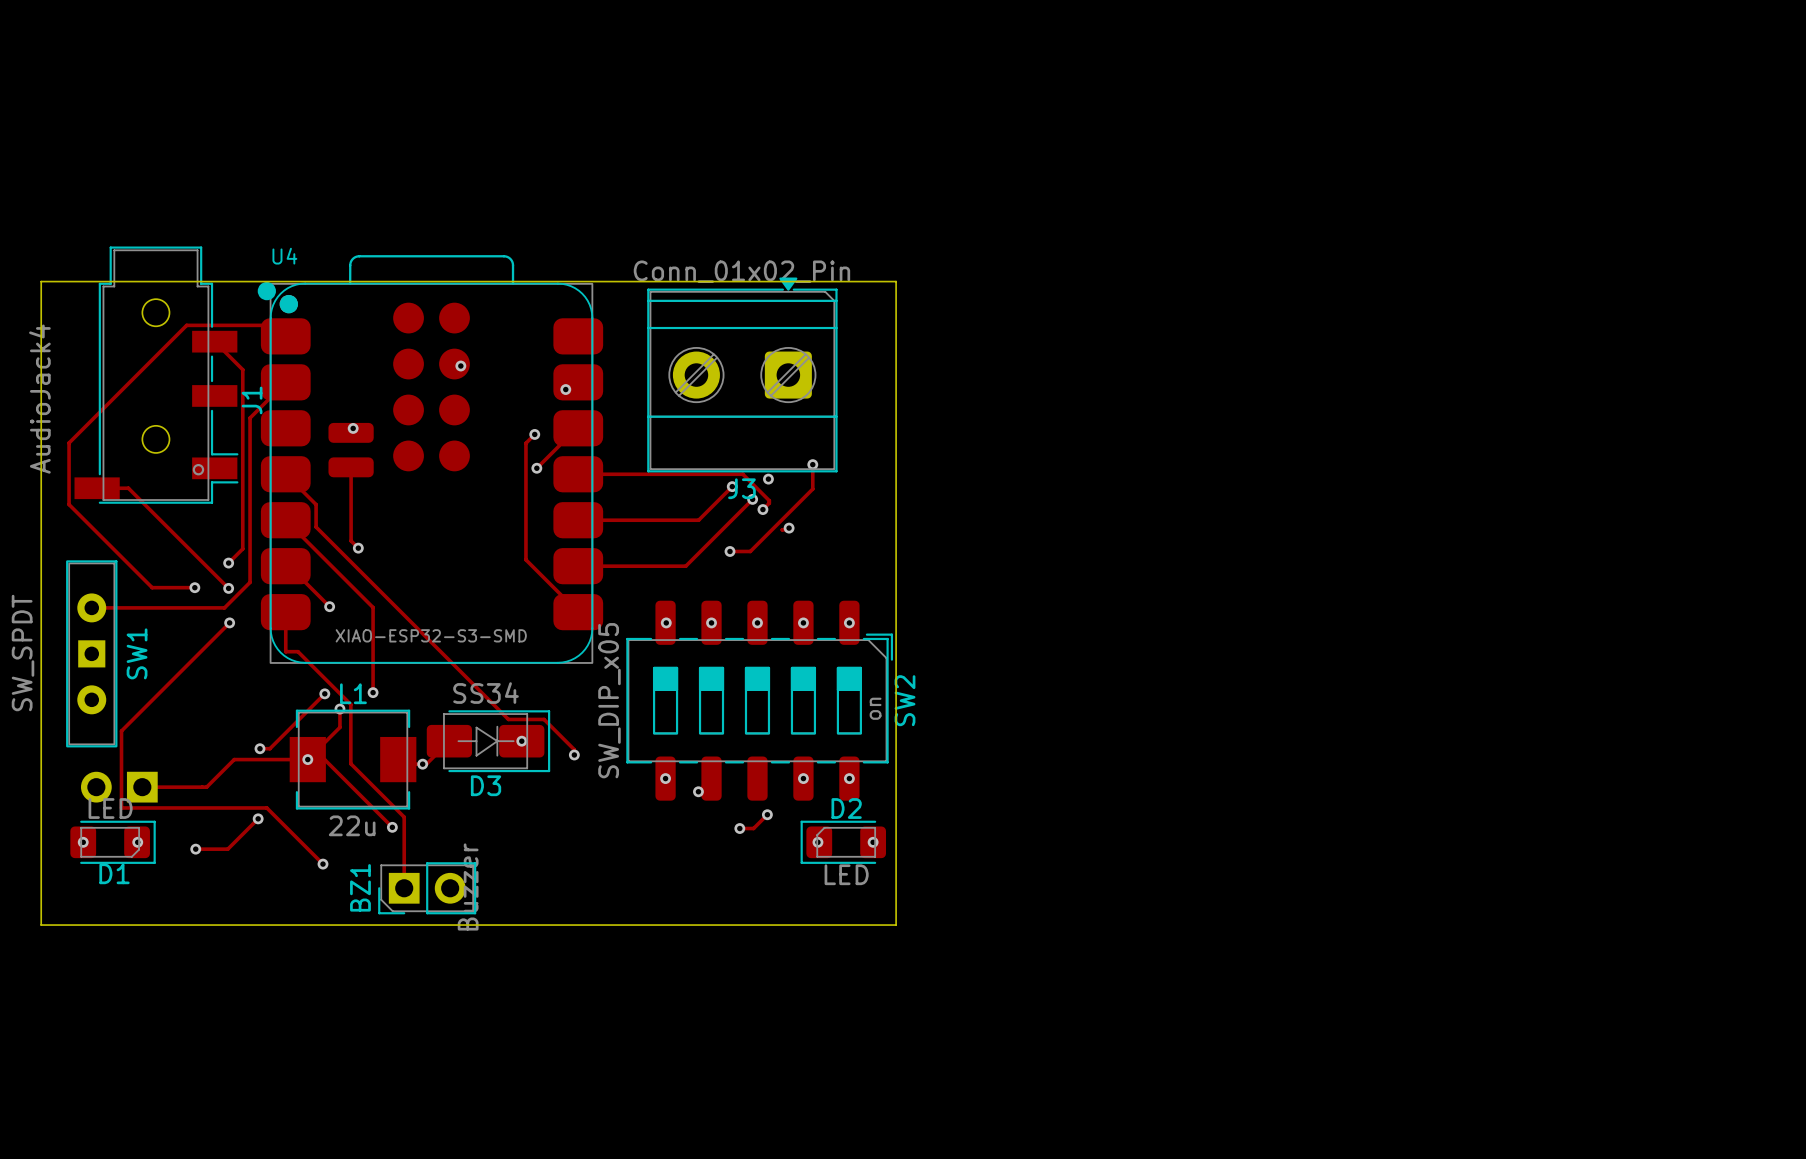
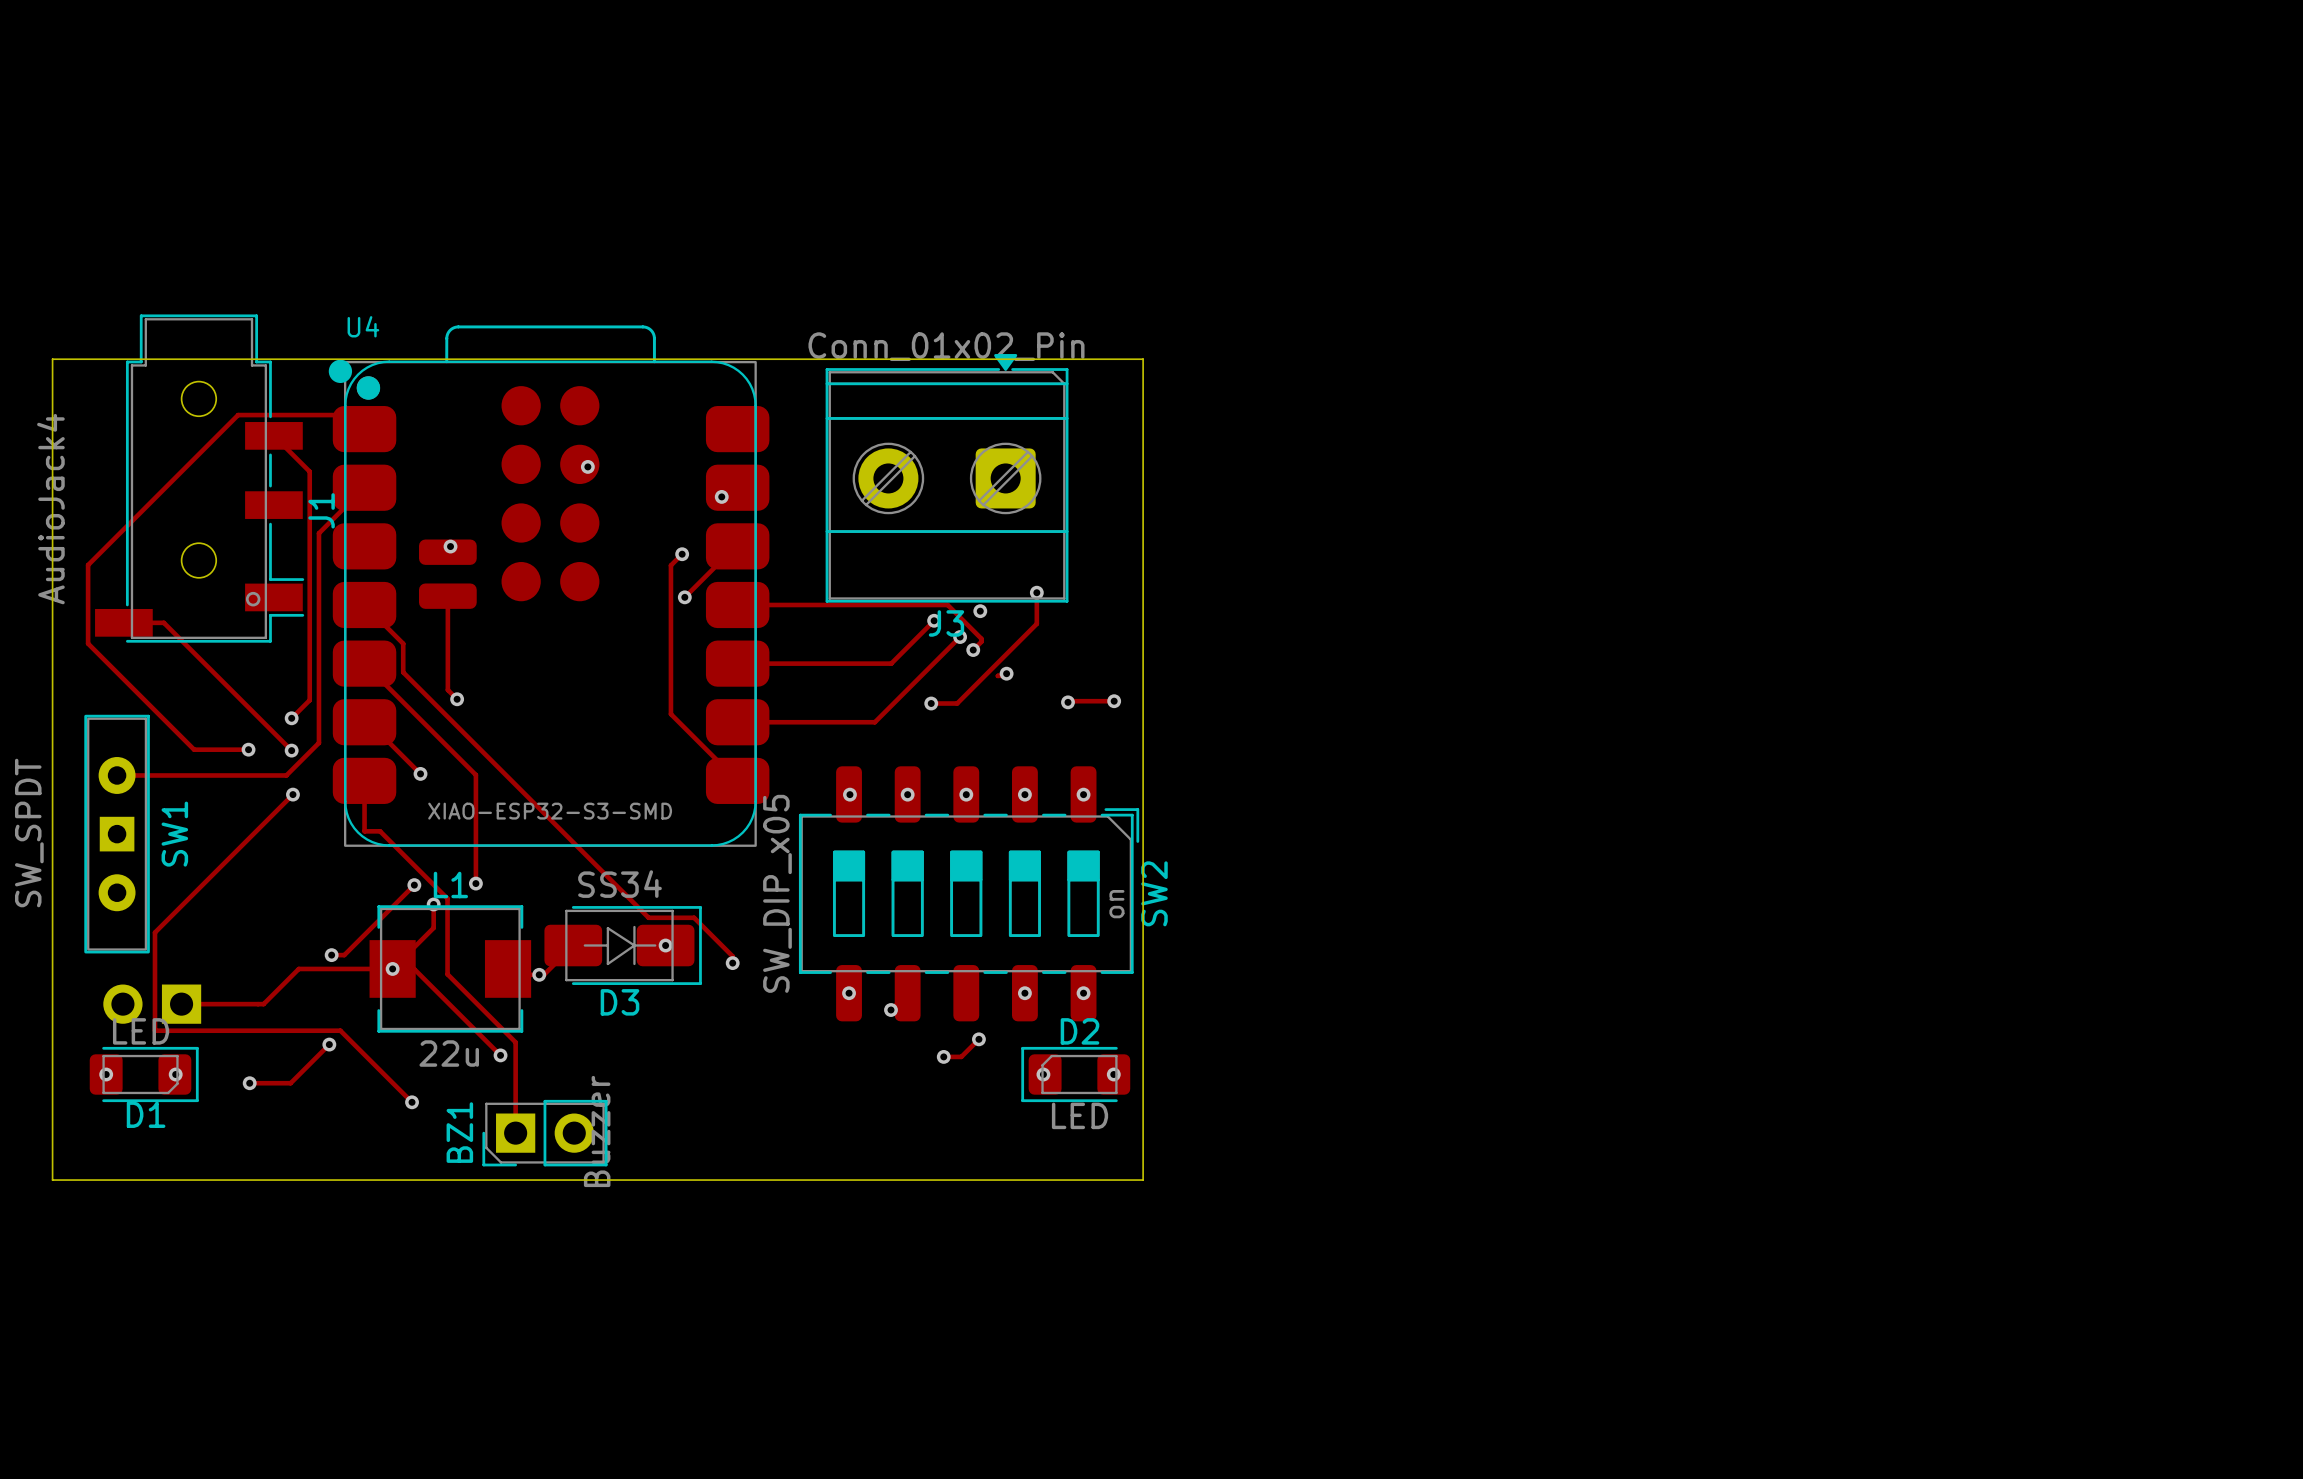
track: none -> (1114, 701) (1067, 702)
via: none -> (1114, 701)
via: none -> (1067, 702)

